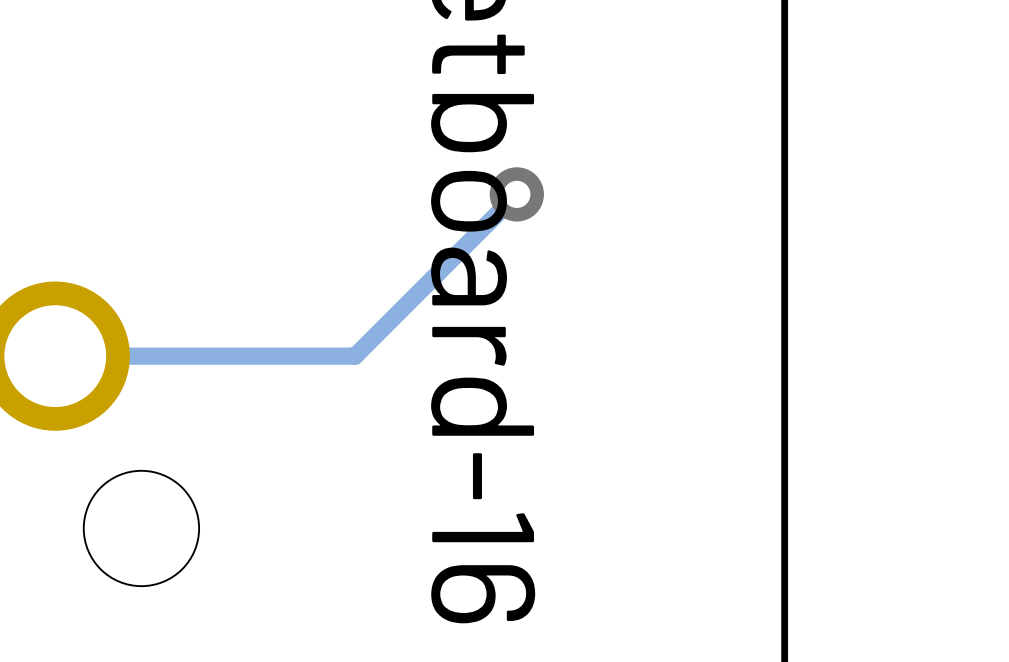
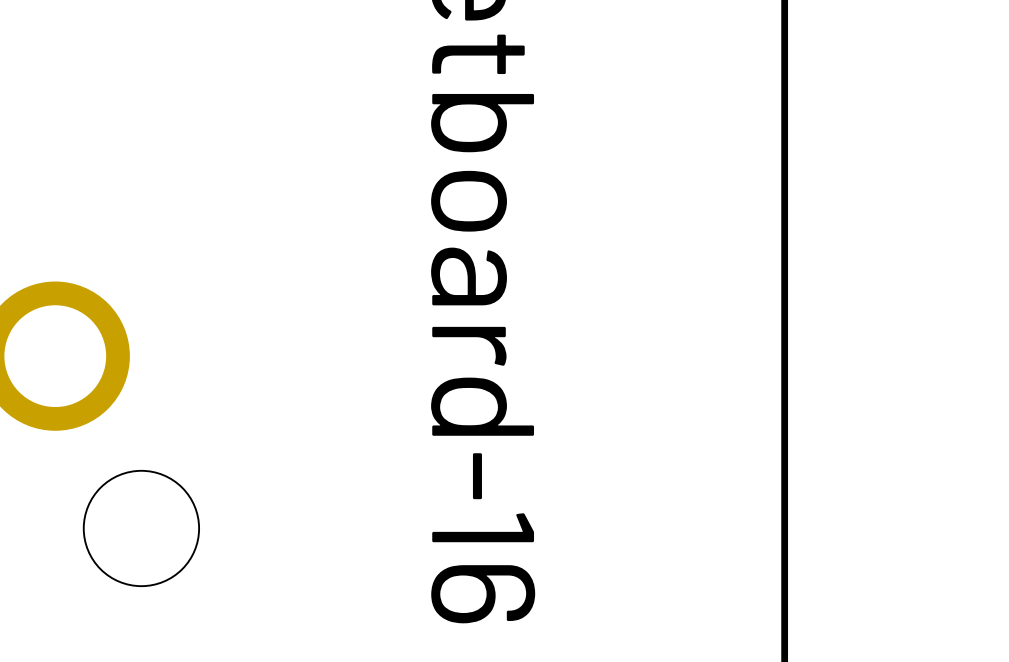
track: (516, 194) (355, 356) (55, 356) -> none
via: (516, 194) -> none

